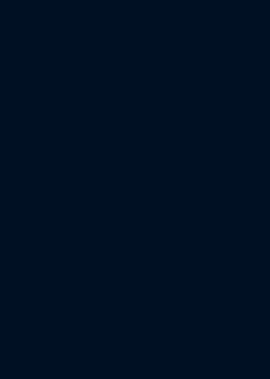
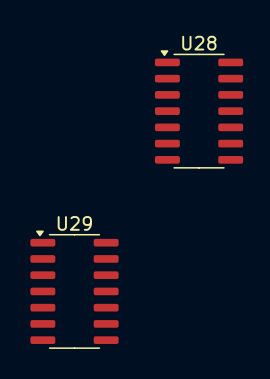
U28: none -> (199, 109)
U29: none -> (74, 289)

